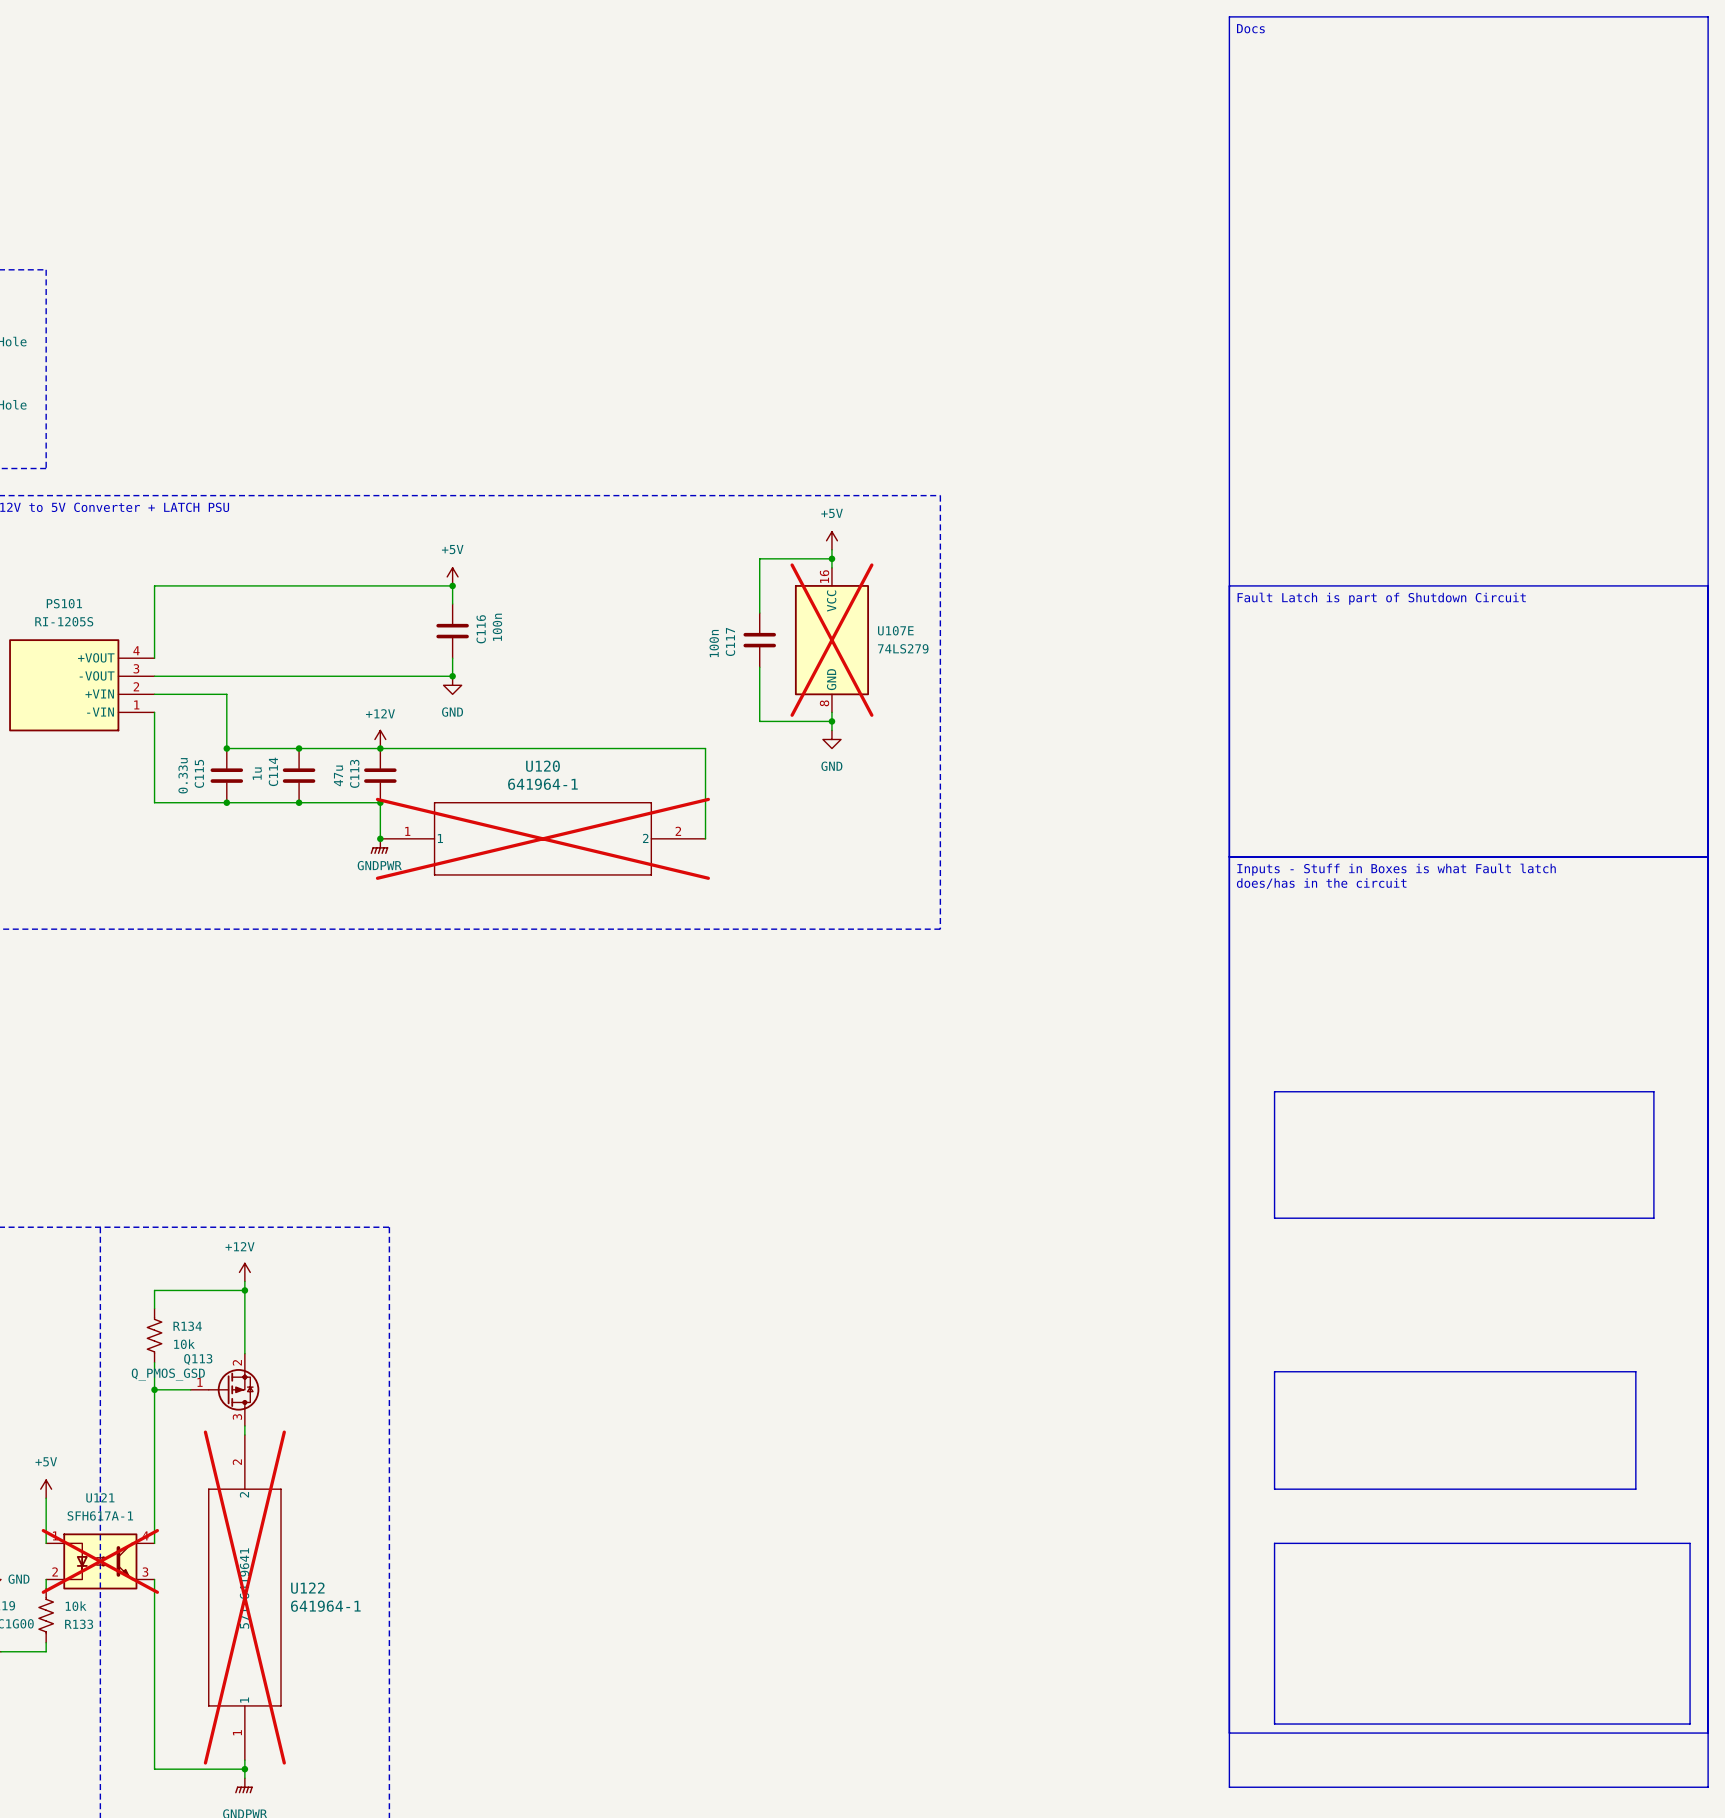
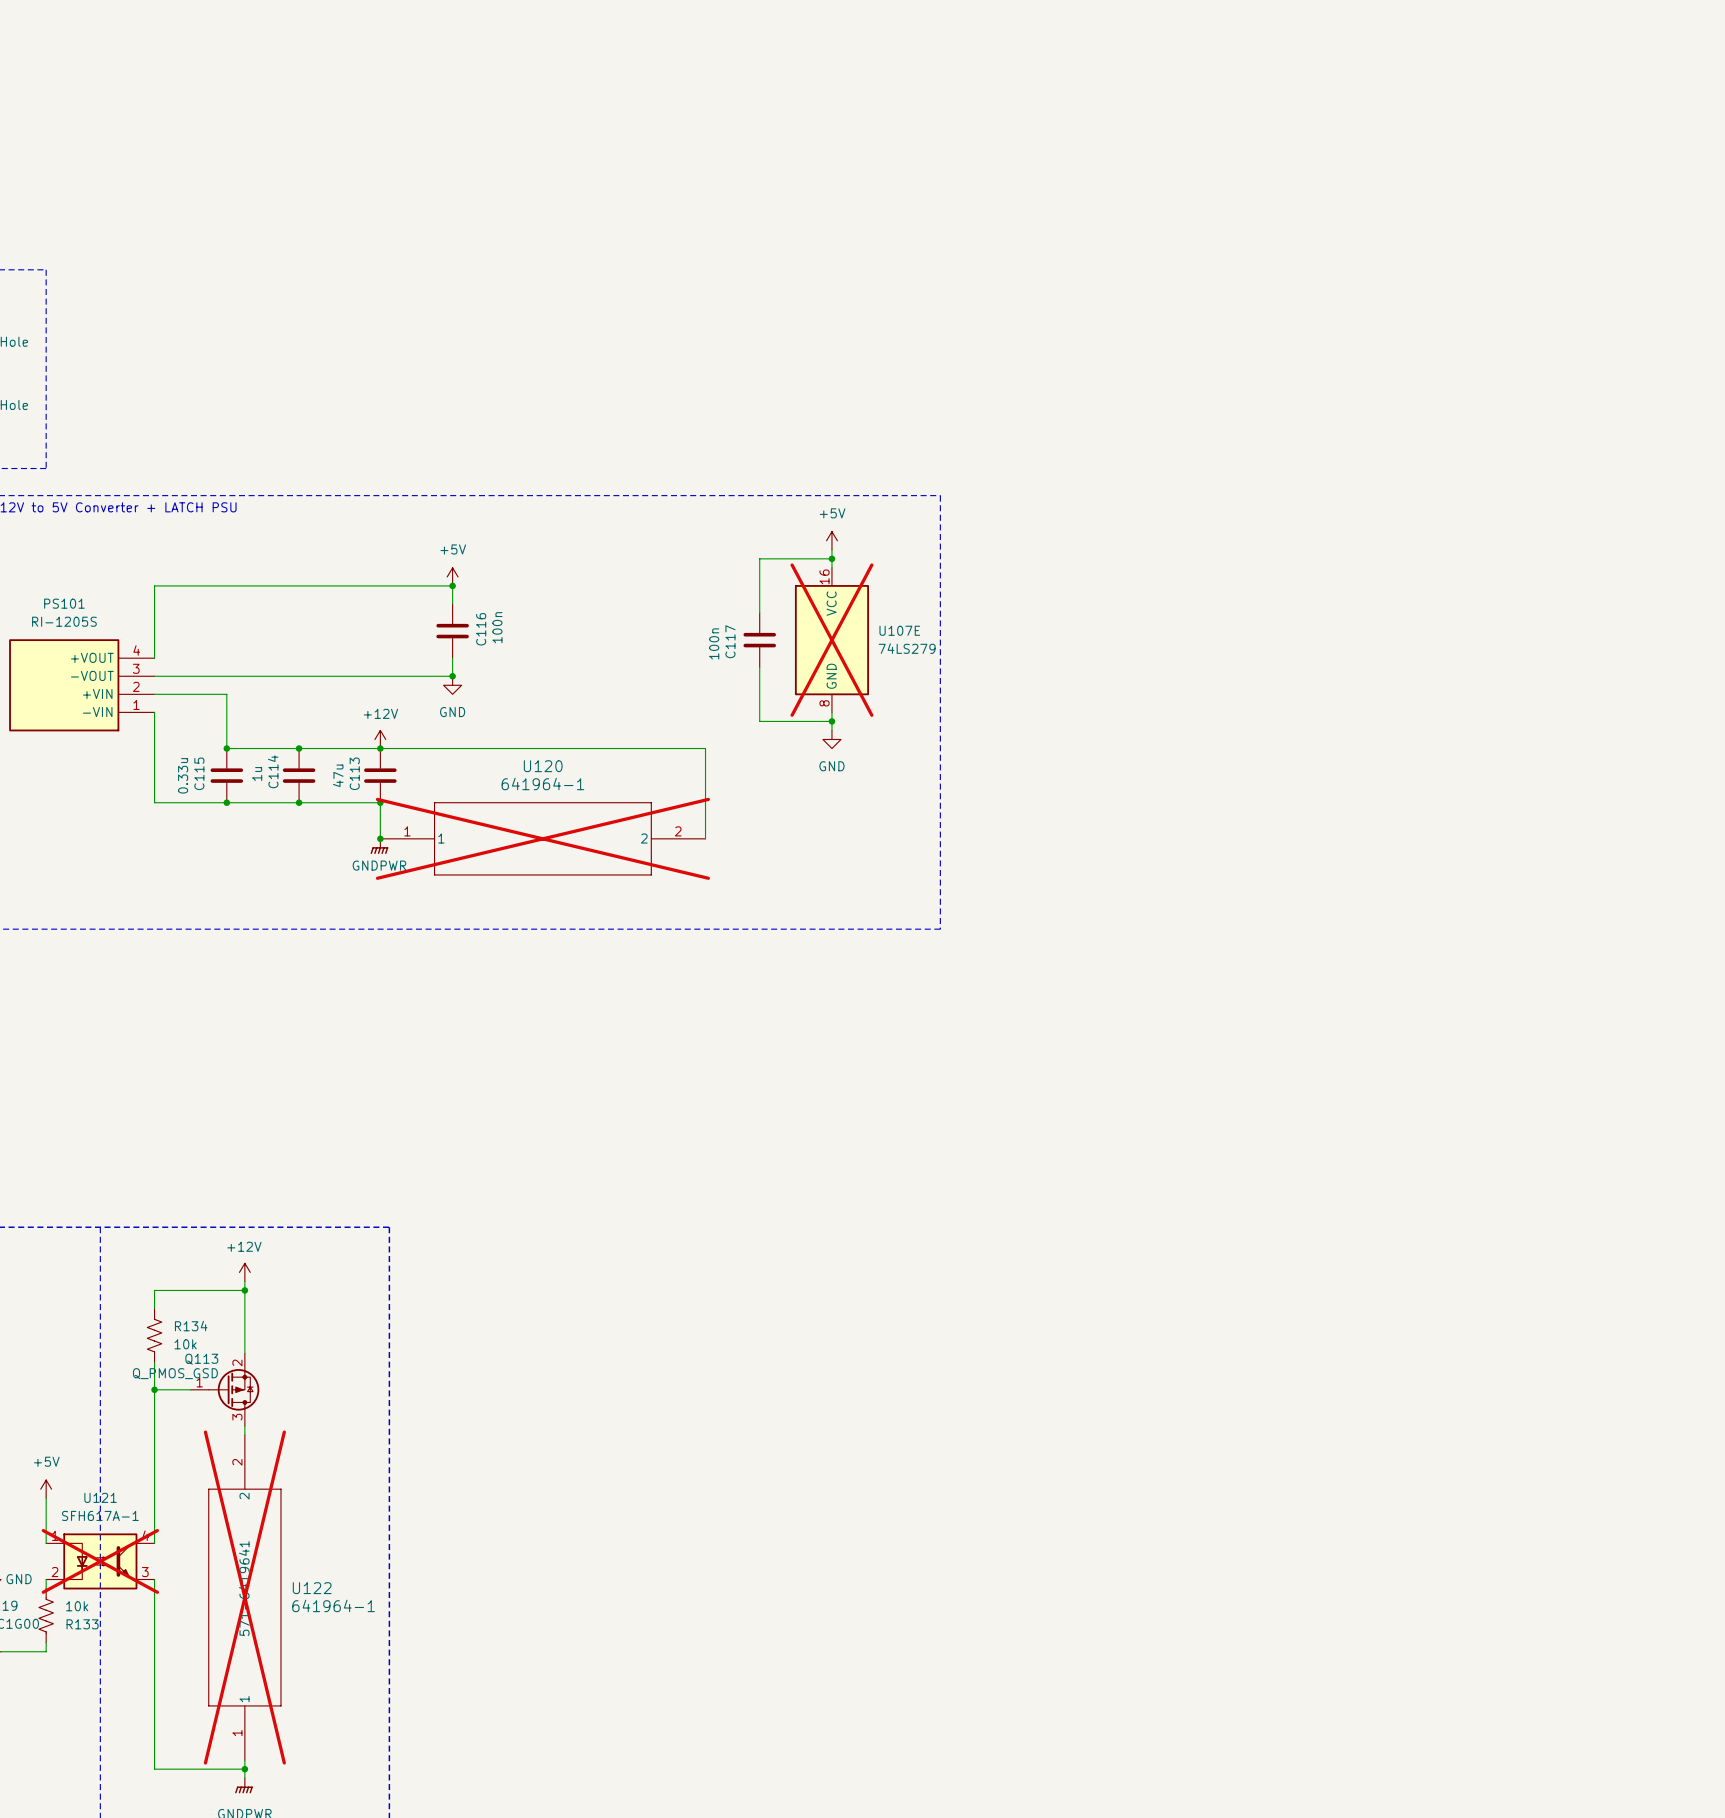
line: (1229, 16) (1229, 1787) (1708, 1787) (1708, 16) (1229, 16) -> none
text: Docs (1250, 28) -> none
line: (1229, 585) (1708, 585) -> none
text: Fault Latch is part of Shutdown Circuit (1381, 598) -> none
line: (1229, 856) (1708, 856) -> none
text: Inputs - Stuff in Boxes is what Fault latch (1396, 869) -> none
text: does/has in the circuit (1321, 883) -> none
line: (1274, 1091) (1274, 1218) (1653, 1218) (1653, 1091) (1274, 1091) -> none
line: (1274, 1371) (1274, 1489) (1635, 1489) (1635, 1371) (1274, 1371) -> none
line: (1274, 1543) (1690, 1543) (1690, 1724) (1274, 1724) (1274, 1543) -> none
line: (1229, 1733) (1708, 1733) -> none

